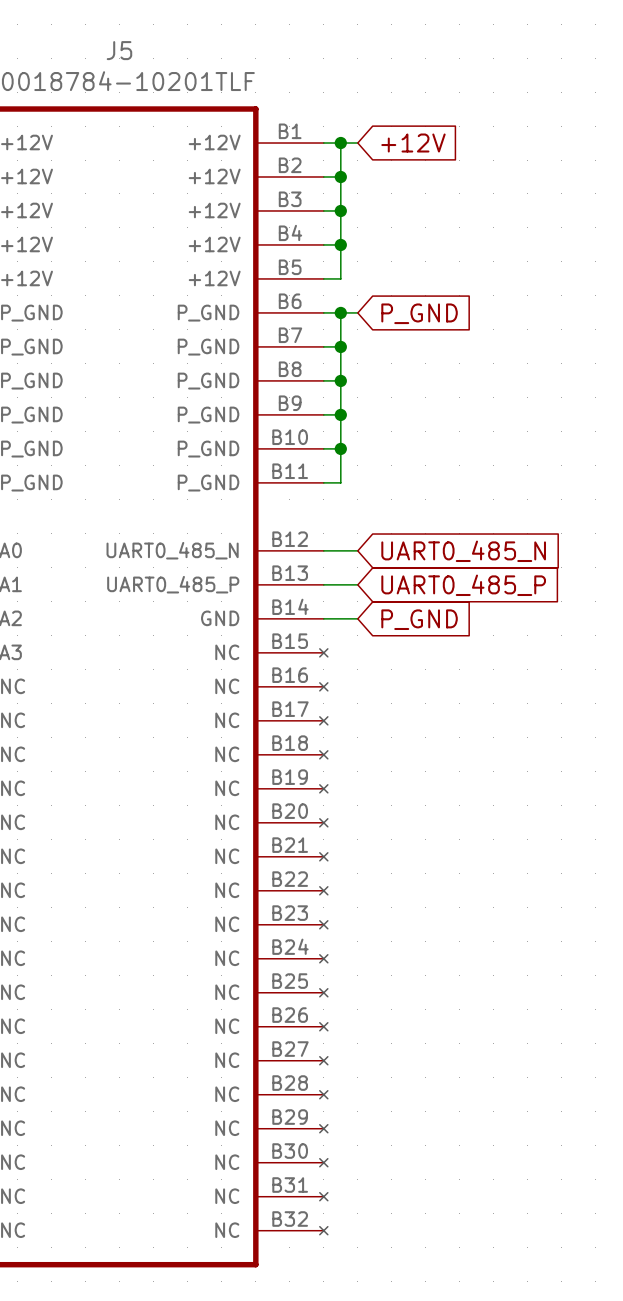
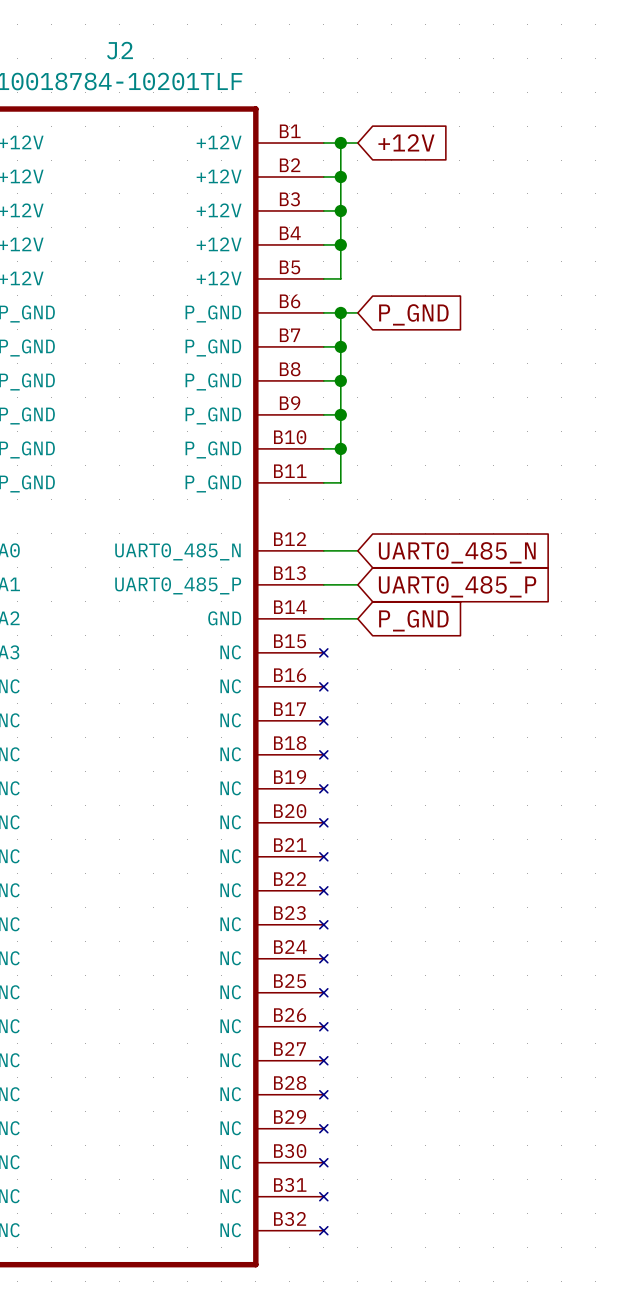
J5 name: J5 (119, 50) -> J2 (120, 50)

